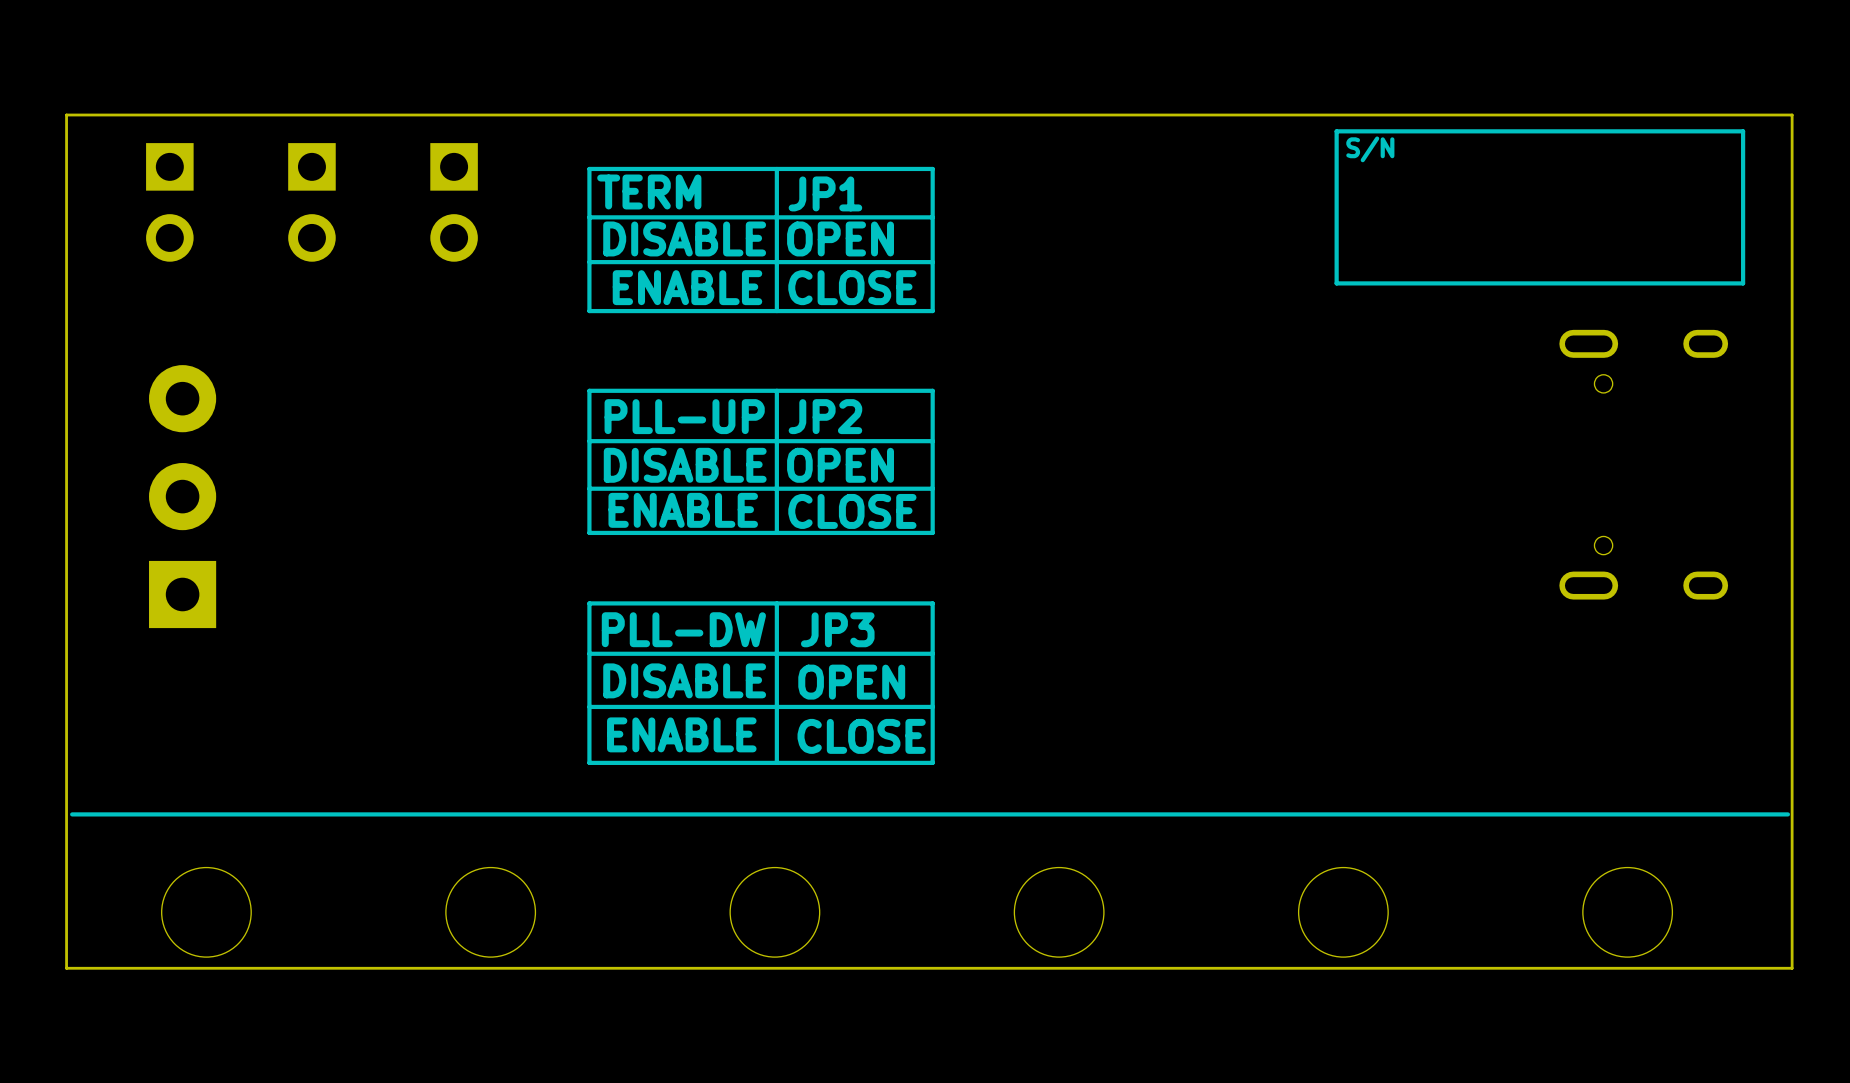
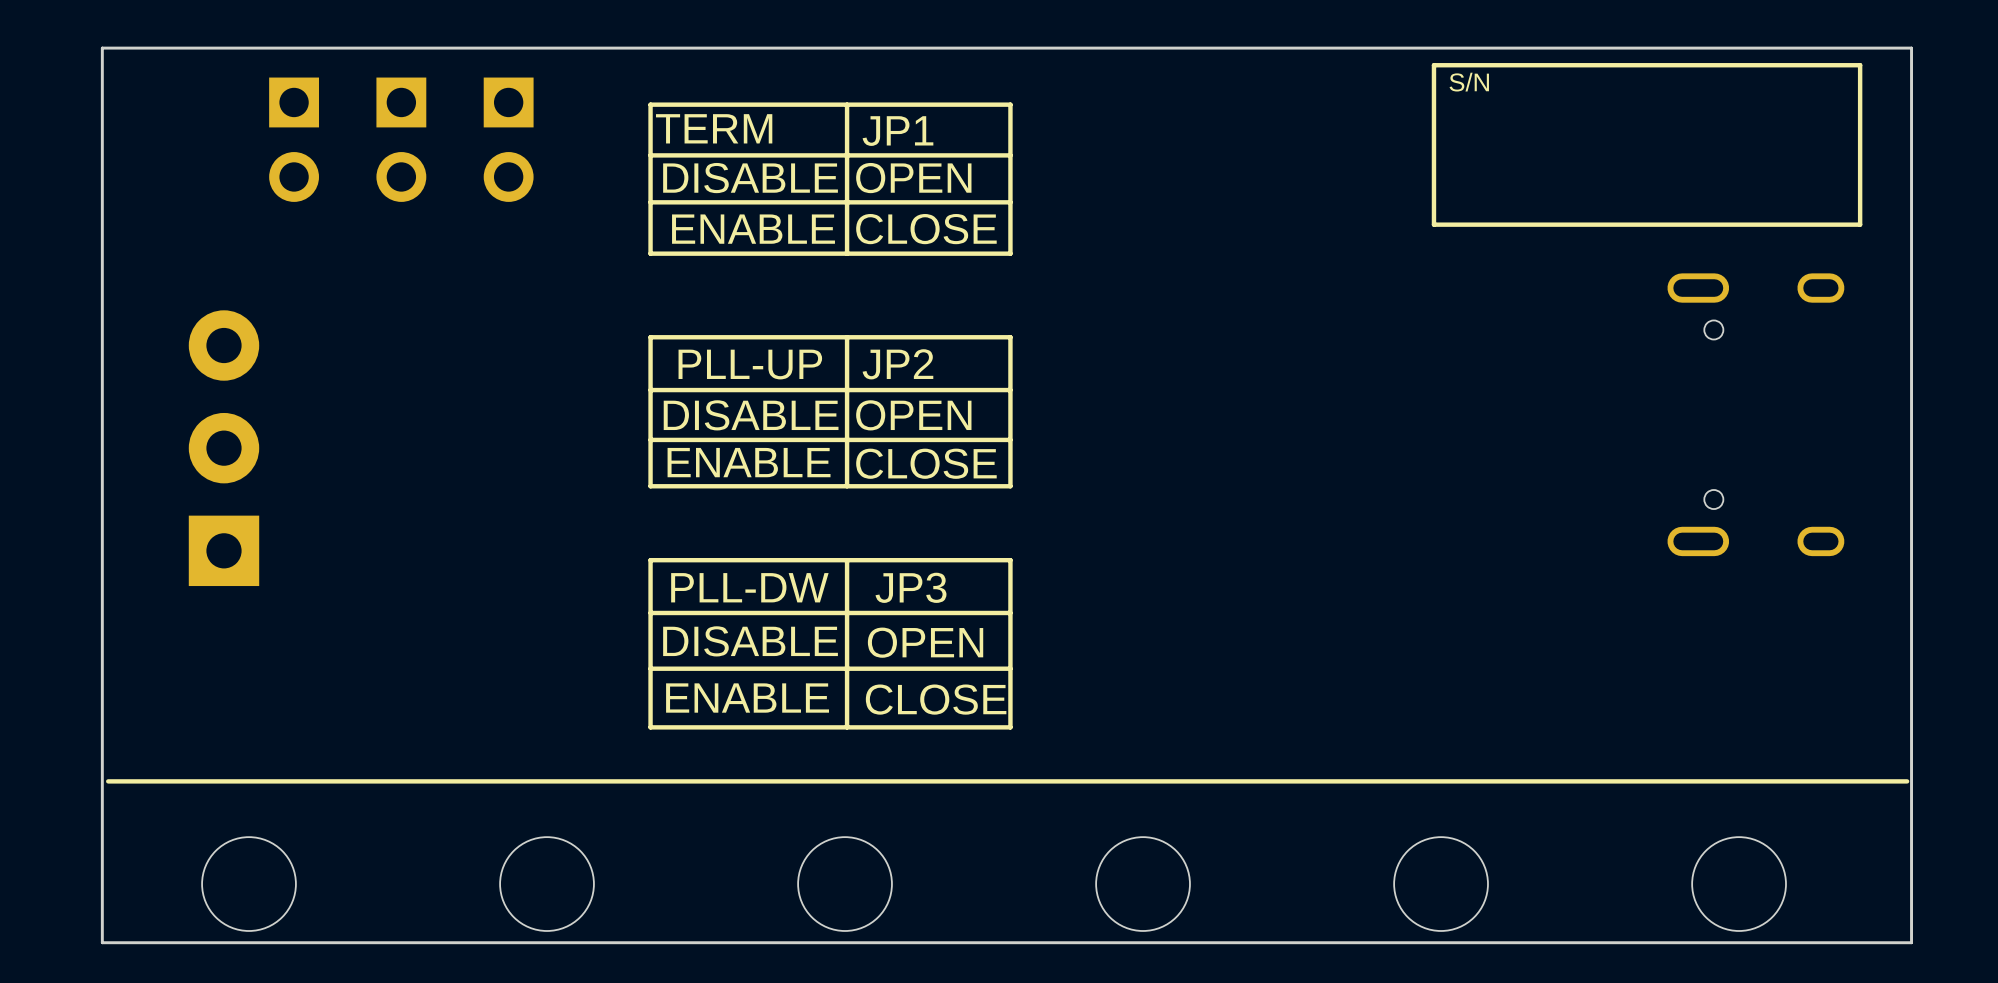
part: (169, 202) -> none
part: none -> (294, 139)
part: (311, 202) -> none
part: none -> (401, 139)

